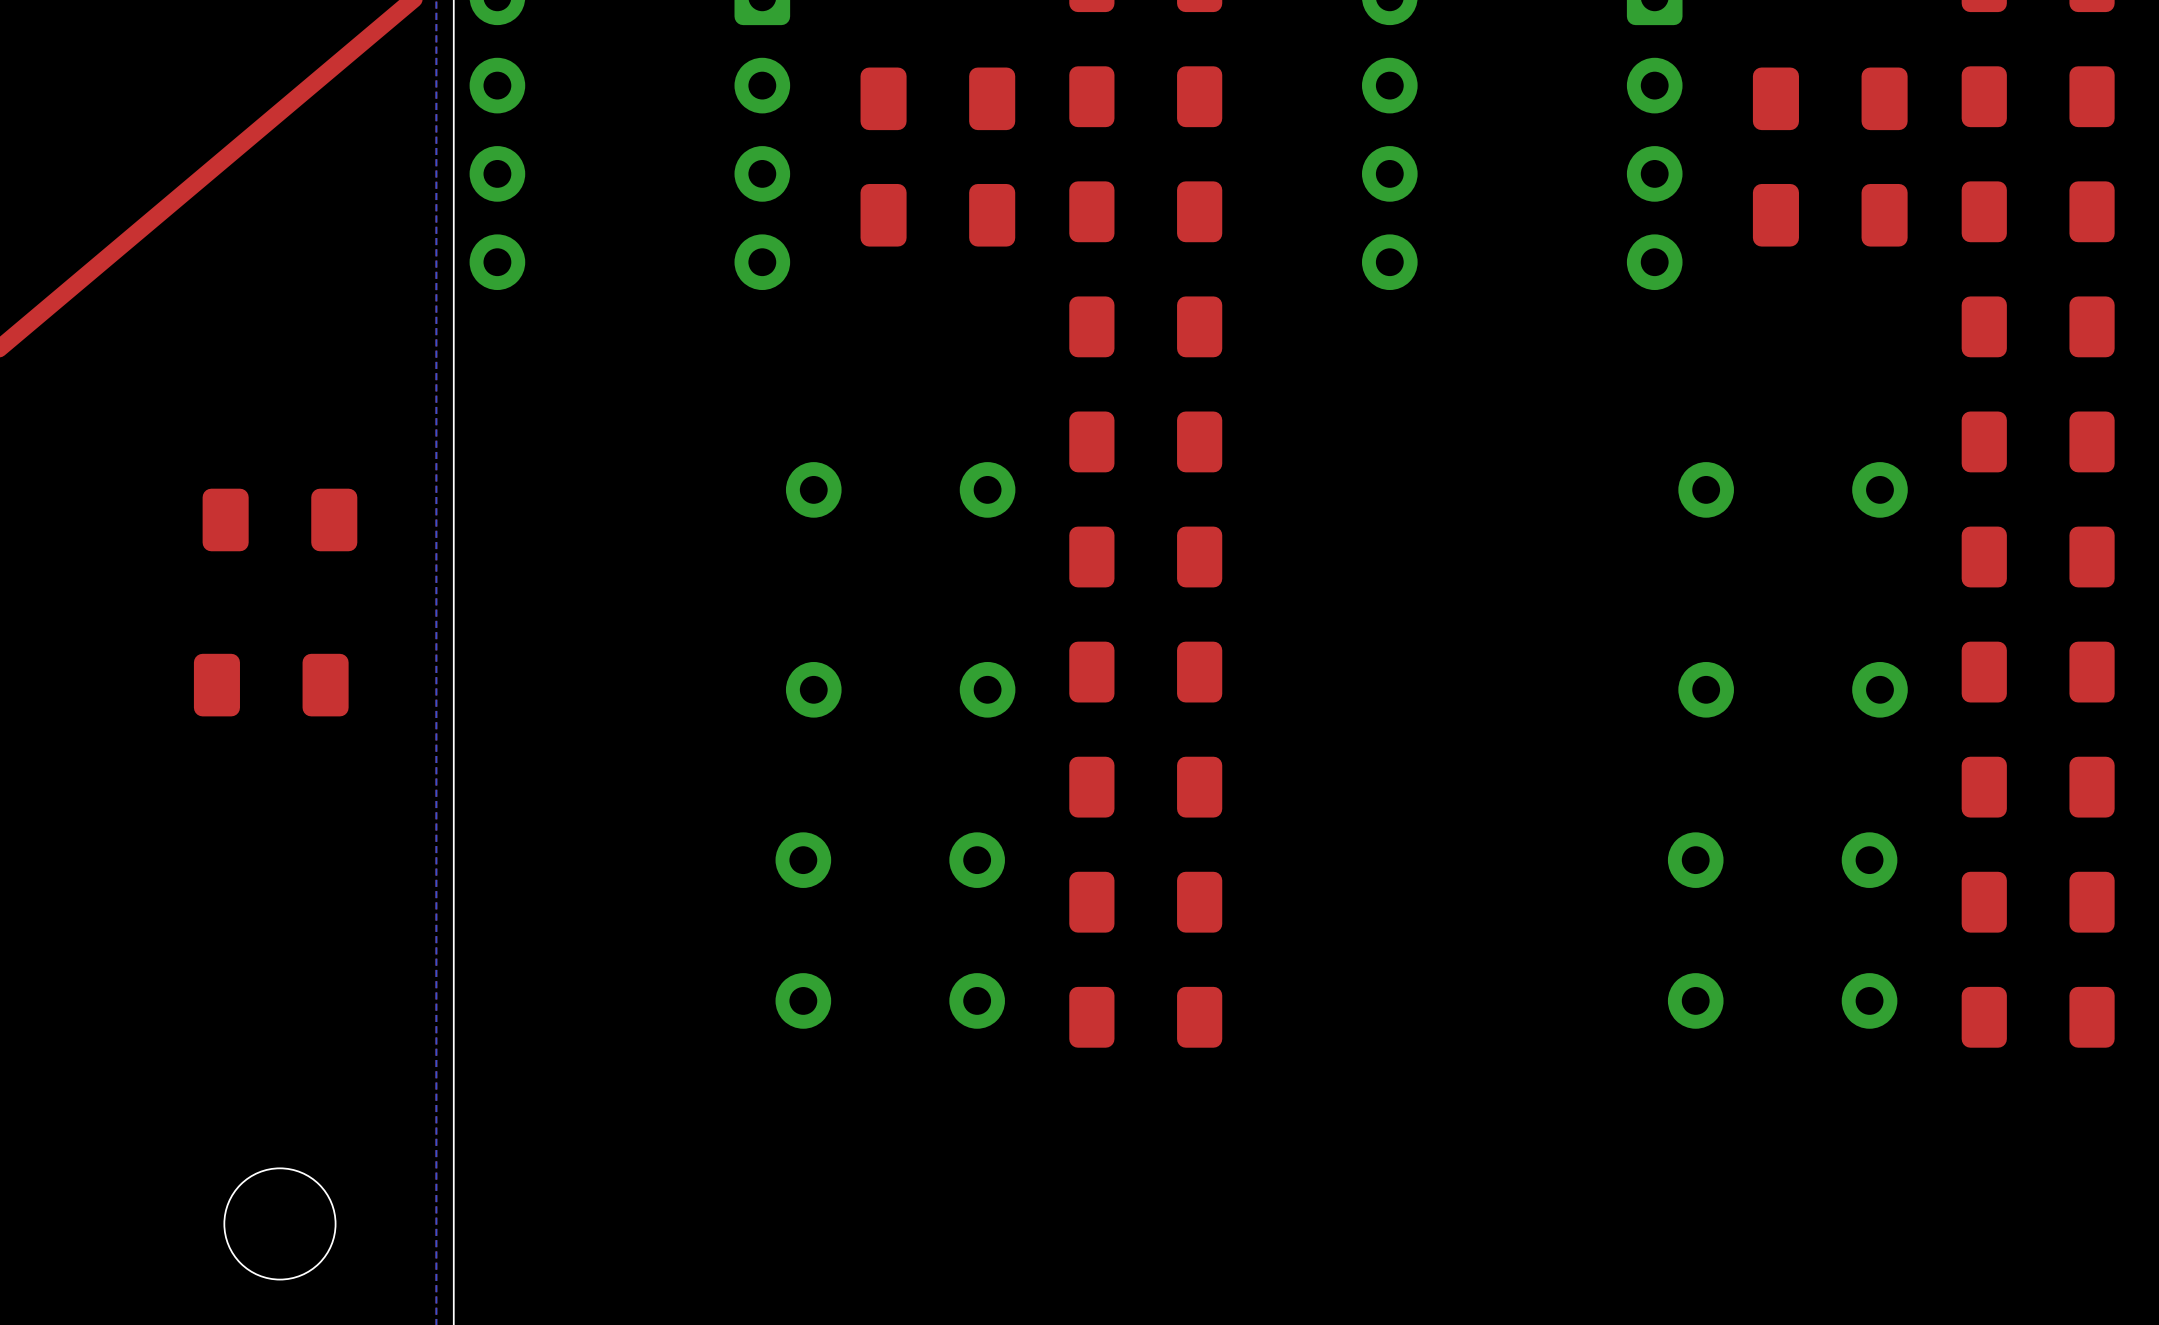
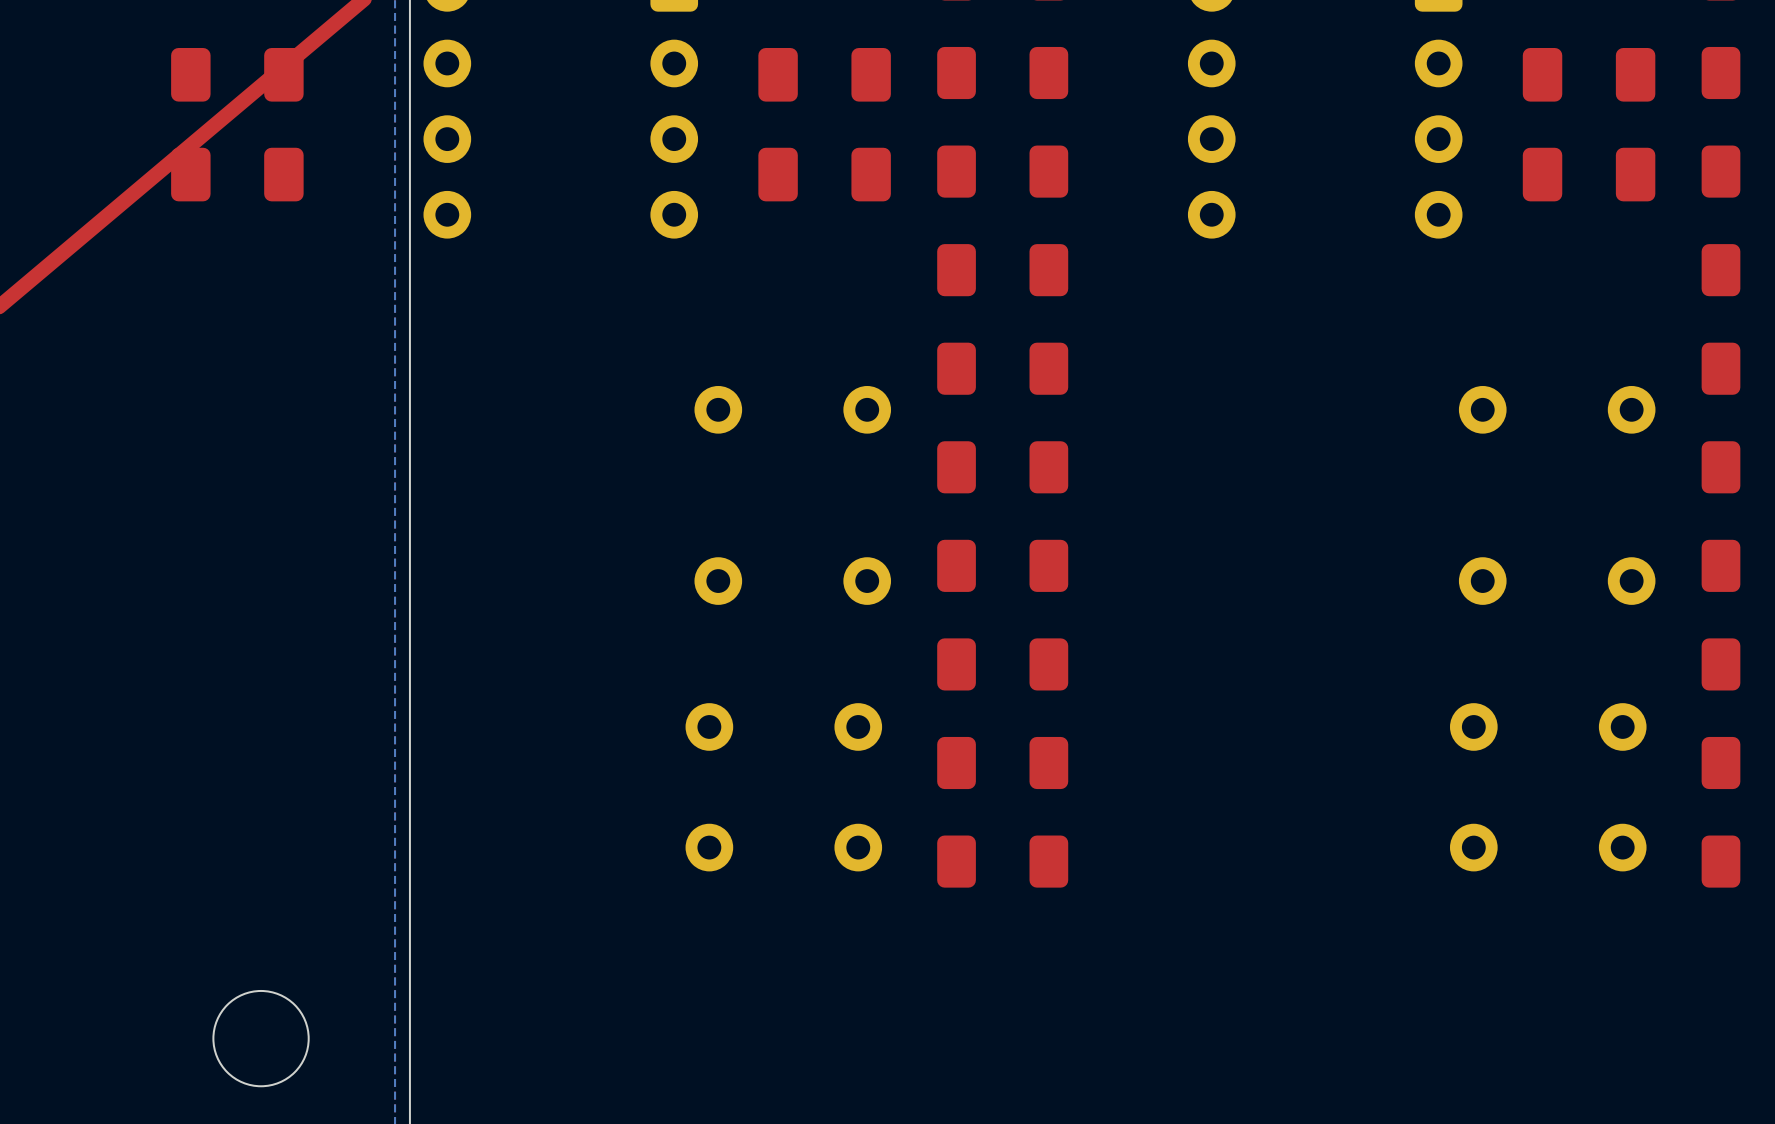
part: none -> (237, 74)
part: none -> (237, 174)
part: (279, 519) -> none
part: (271, 685) -> none

